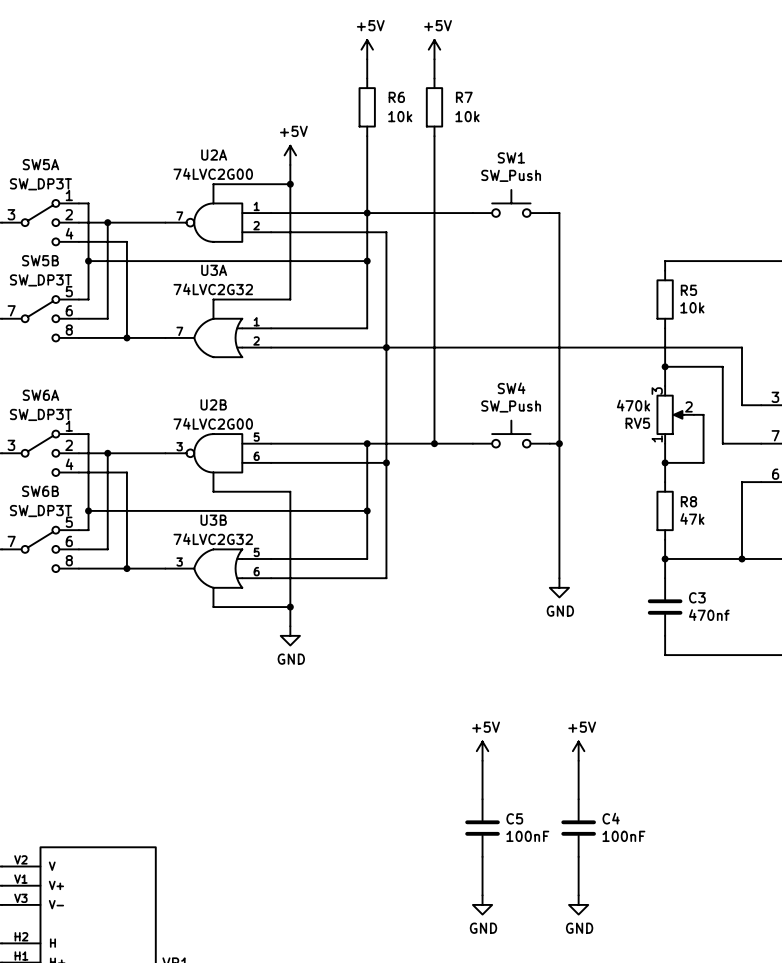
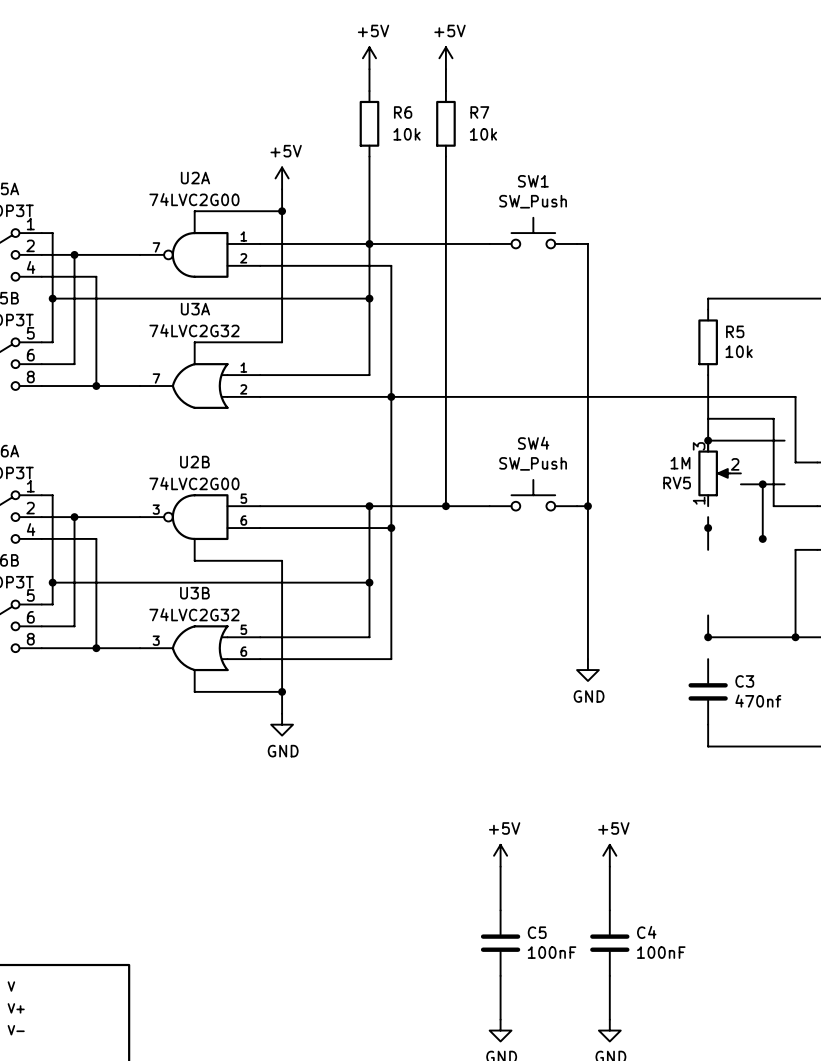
junction position: (665, 366) -> (708, 440)
wire: none -> (784, 440) (708, 440) (708, 451)
RV5 value: 470k (633, 405) -> 1M (680, 463)
wire: (693, 414) (703, 414) (703, 462) (665, 462) -> none
wire: none -> (740, 484) (784, 484)
wire: none -> (762, 484) (762, 538)
junction: none -> (762, 484)
wire: (665, 443) (665, 453) -> none
junction: none -> (762, 538)
R8: 47k (665, 510) -> none
wire: (665, 558) (665, 578) -> none

